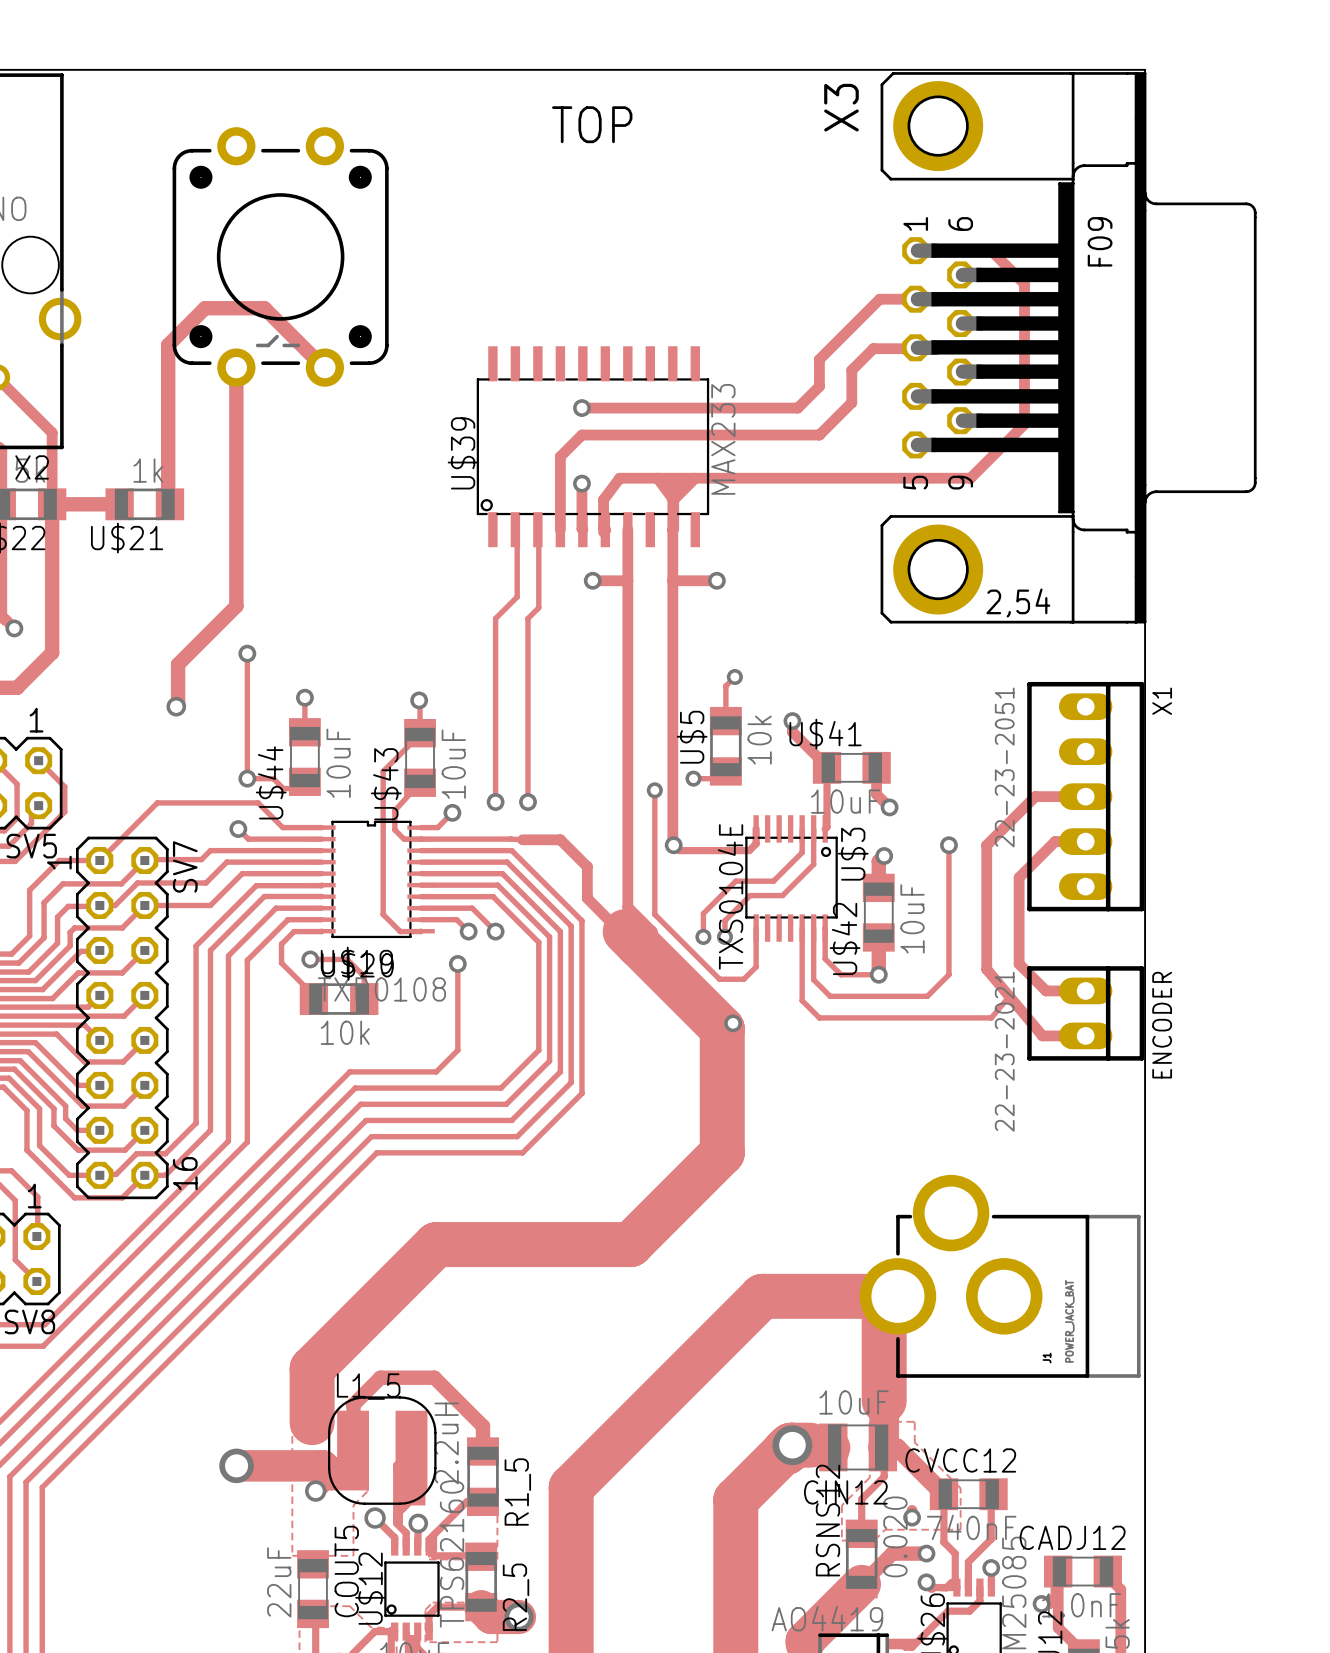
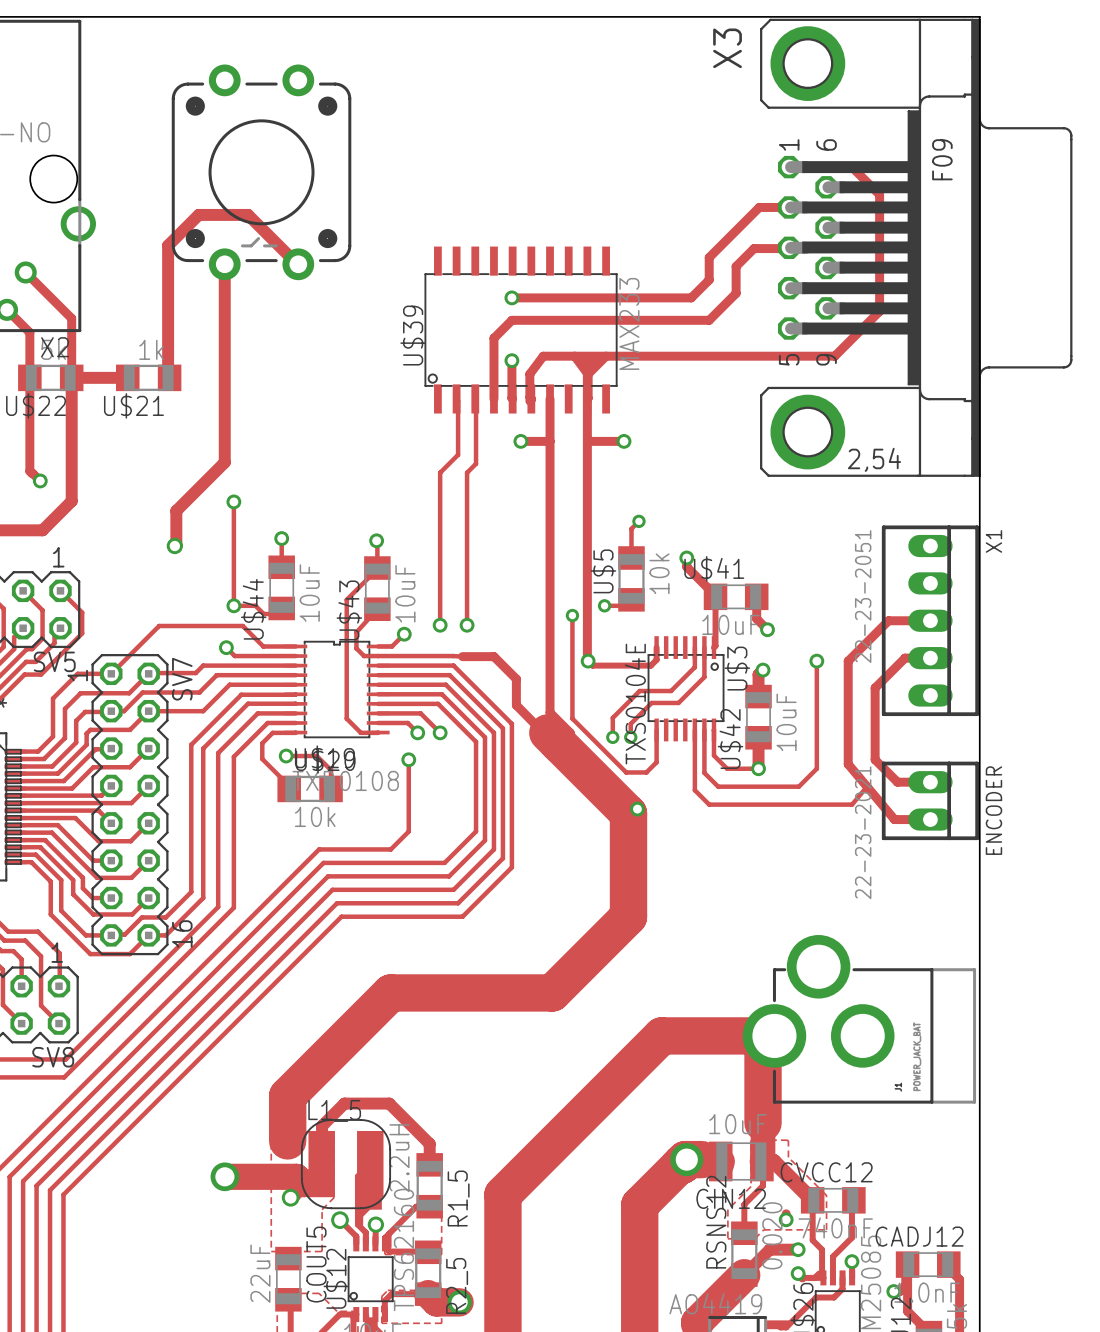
text: TOP (592, 124) -> none

